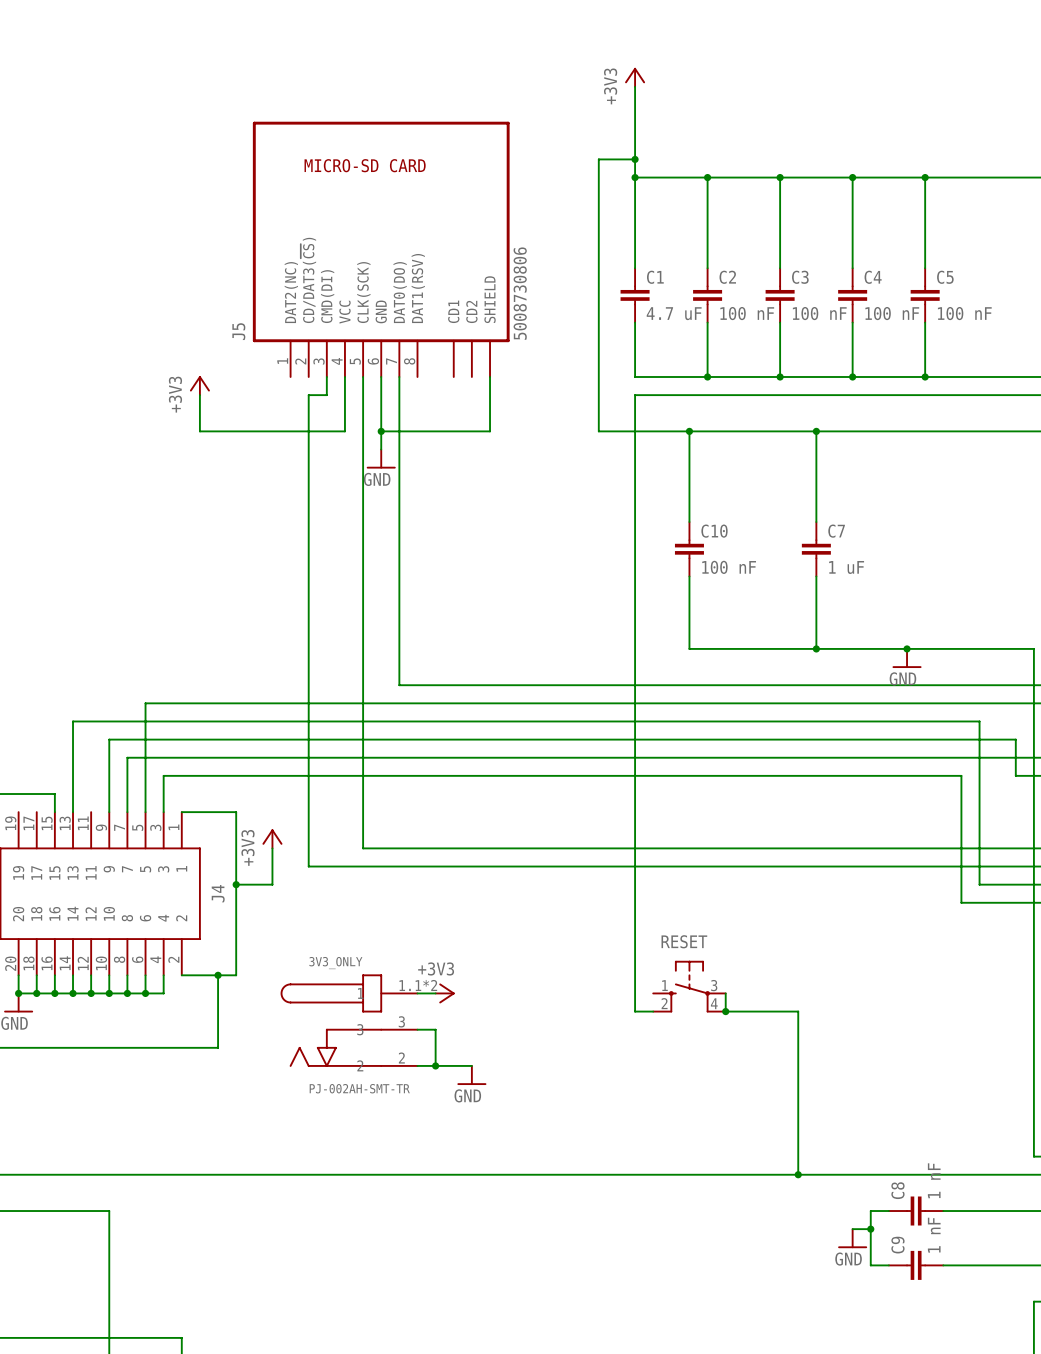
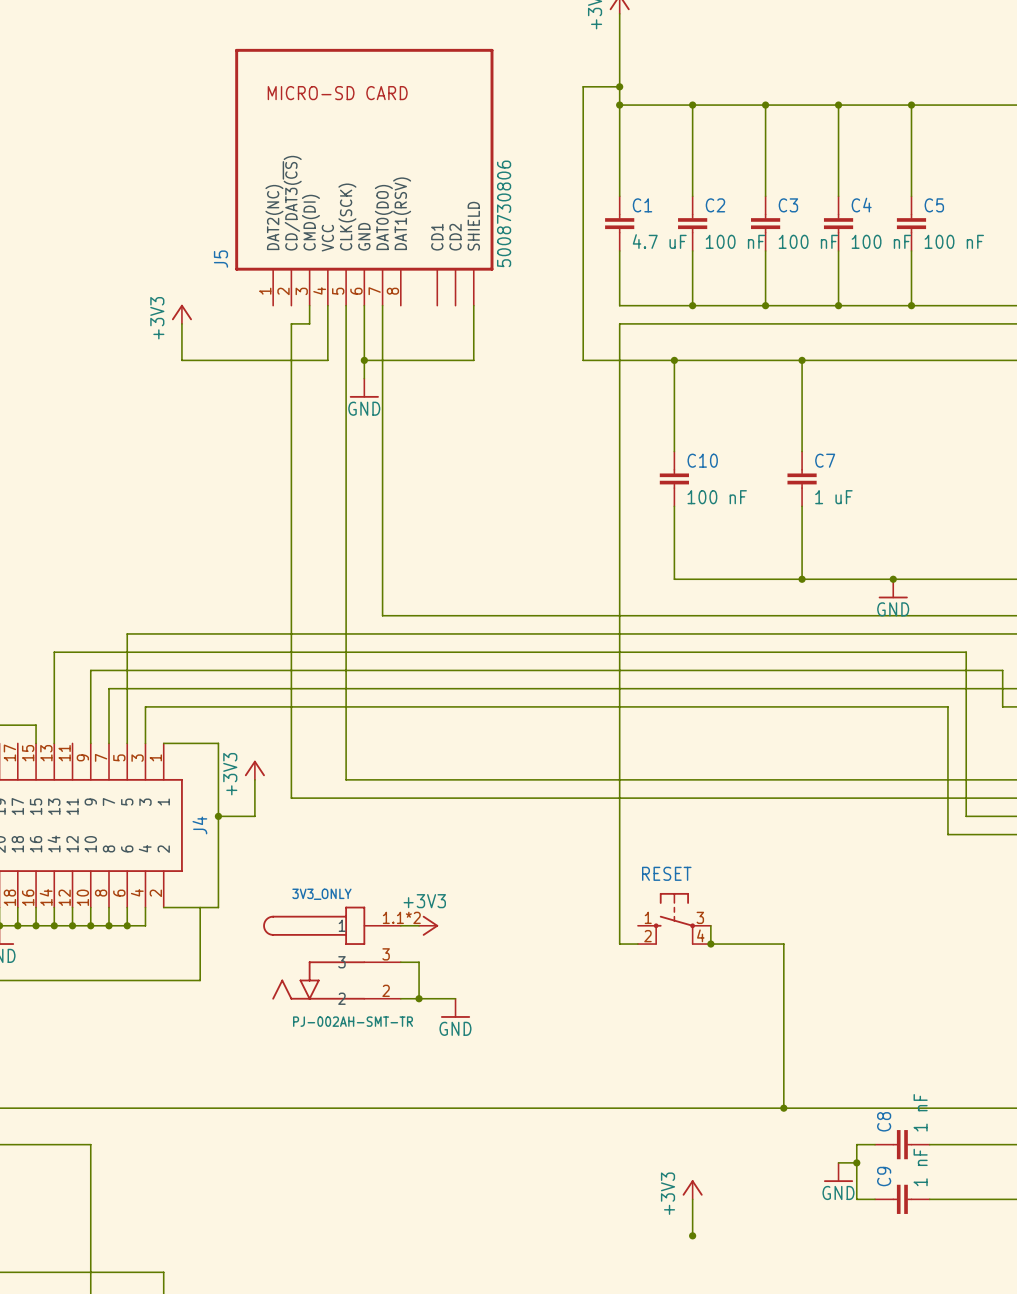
junction: (218, 975) -> none
power symbol: none -> +3V3 (692, 1189)
wire: none -> (692, 1199) (692, 1235)
junction: none -> (692, 1235)

